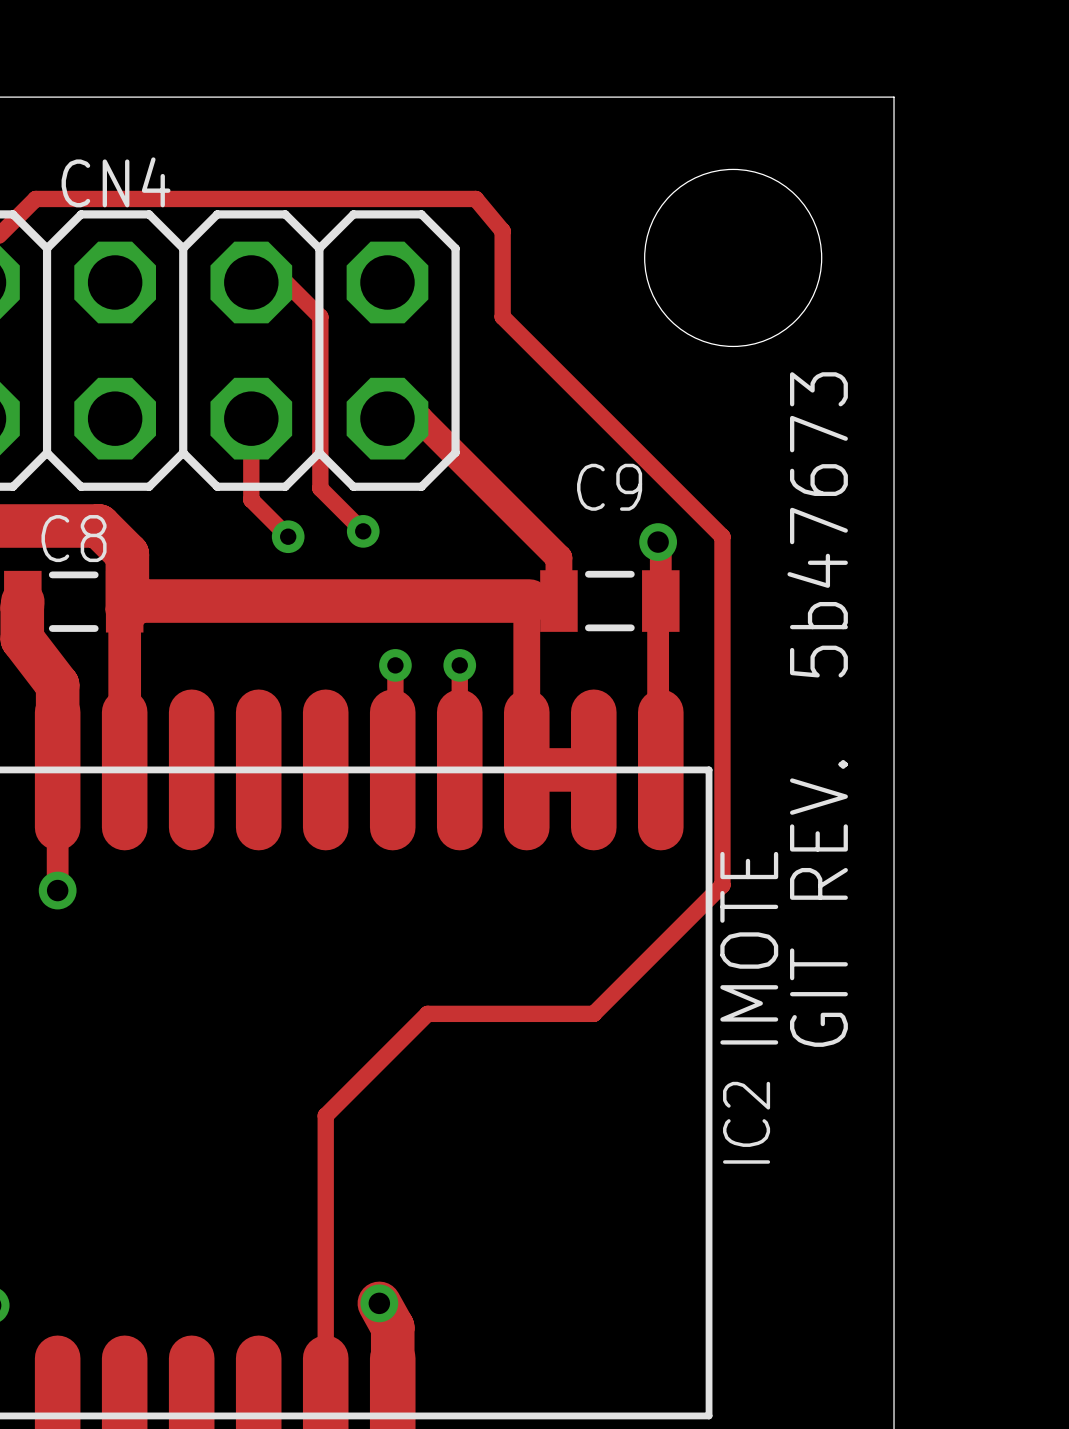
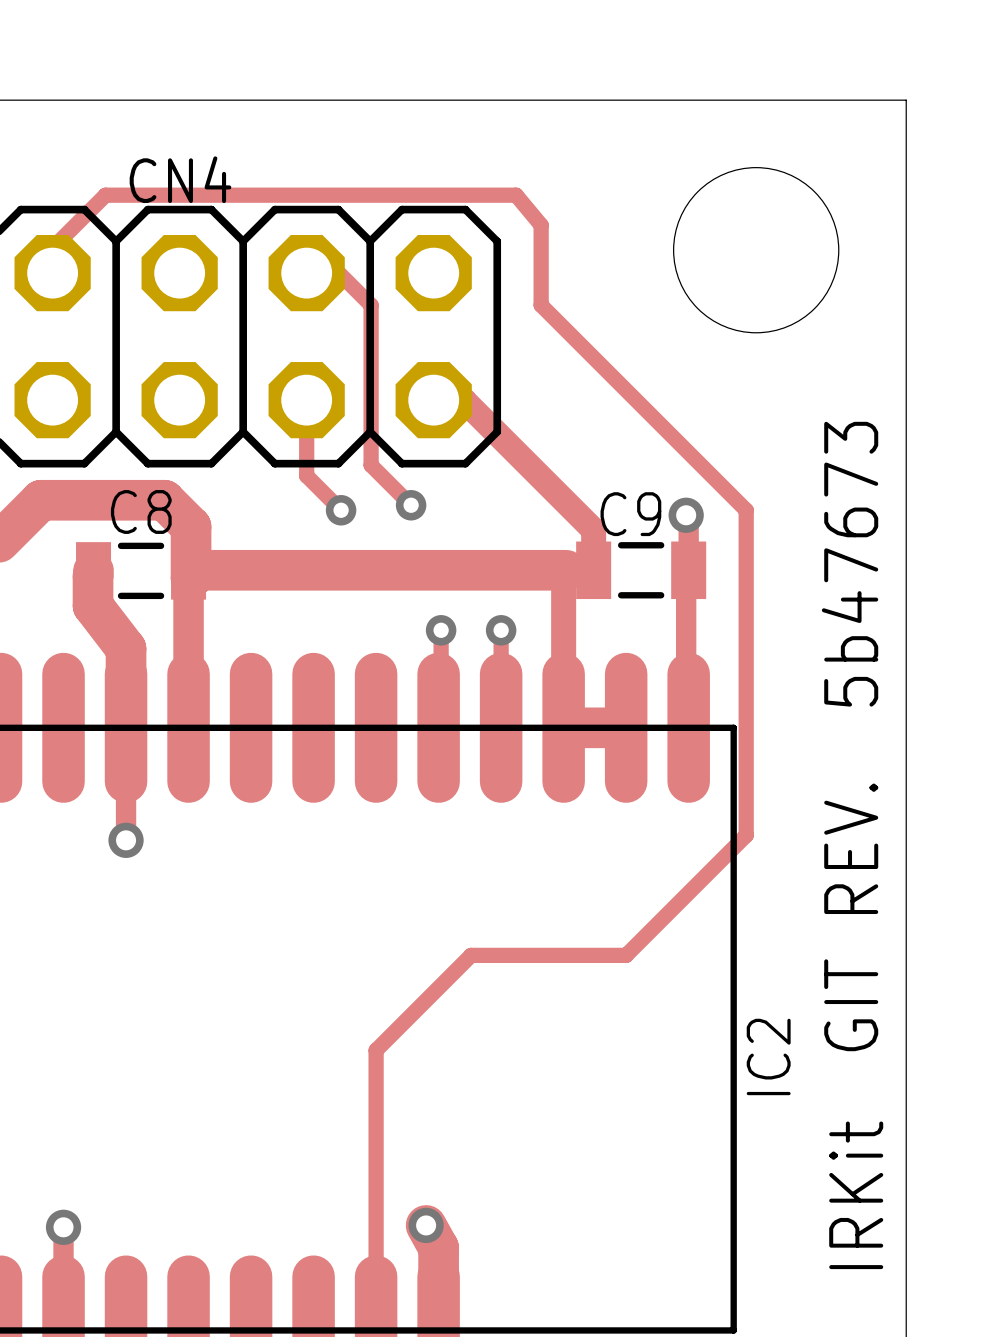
C9 name position: C9 (609, 487) -> C9 (630, 514)
drawing position: (817, 709) -> (850, 736)
text: IMOTE (749, 948) -> none
text: none -> IRKit (856, 1195)

